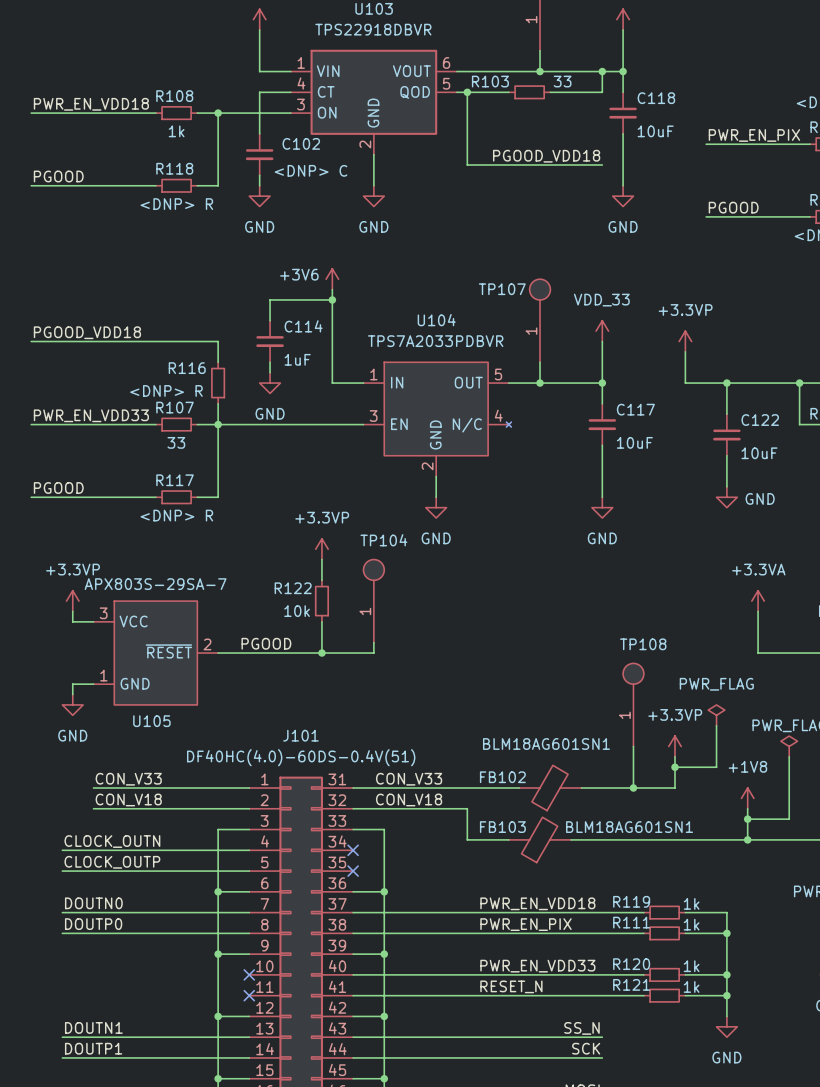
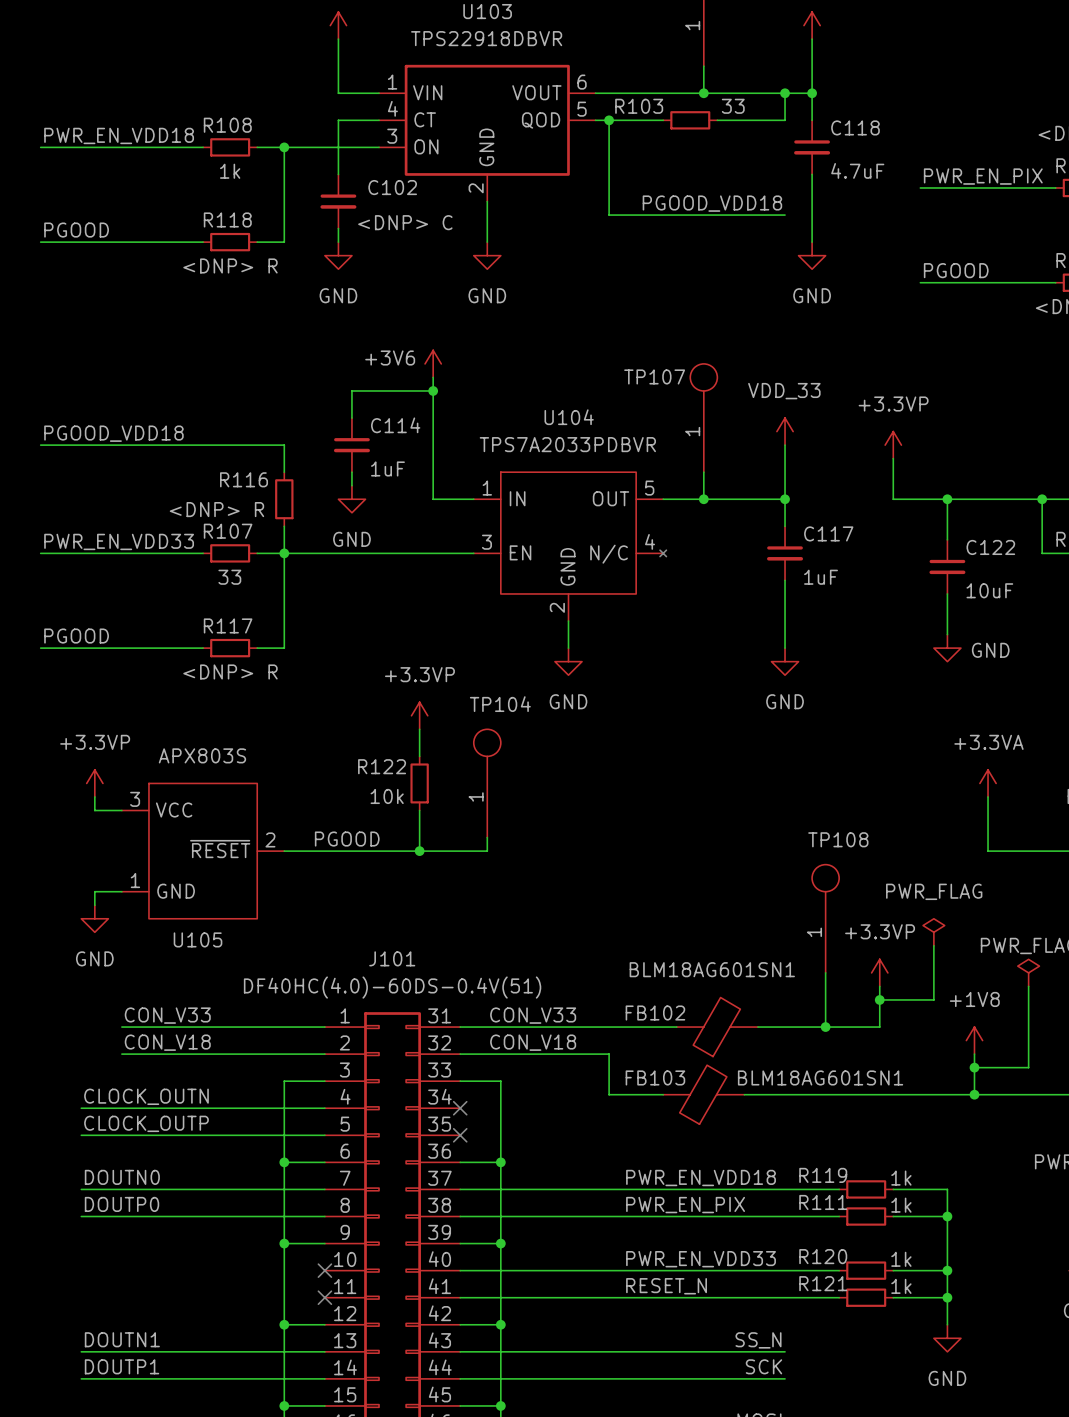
C118 value: 10uF (655, 131) -> 4.7uF (857, 170)
C117 value: 10uF (634, 442) -> 1uF (821, 577)
U105 value: APX803S-29SA-7 (155, 584) -> APX803S (202, 755)

